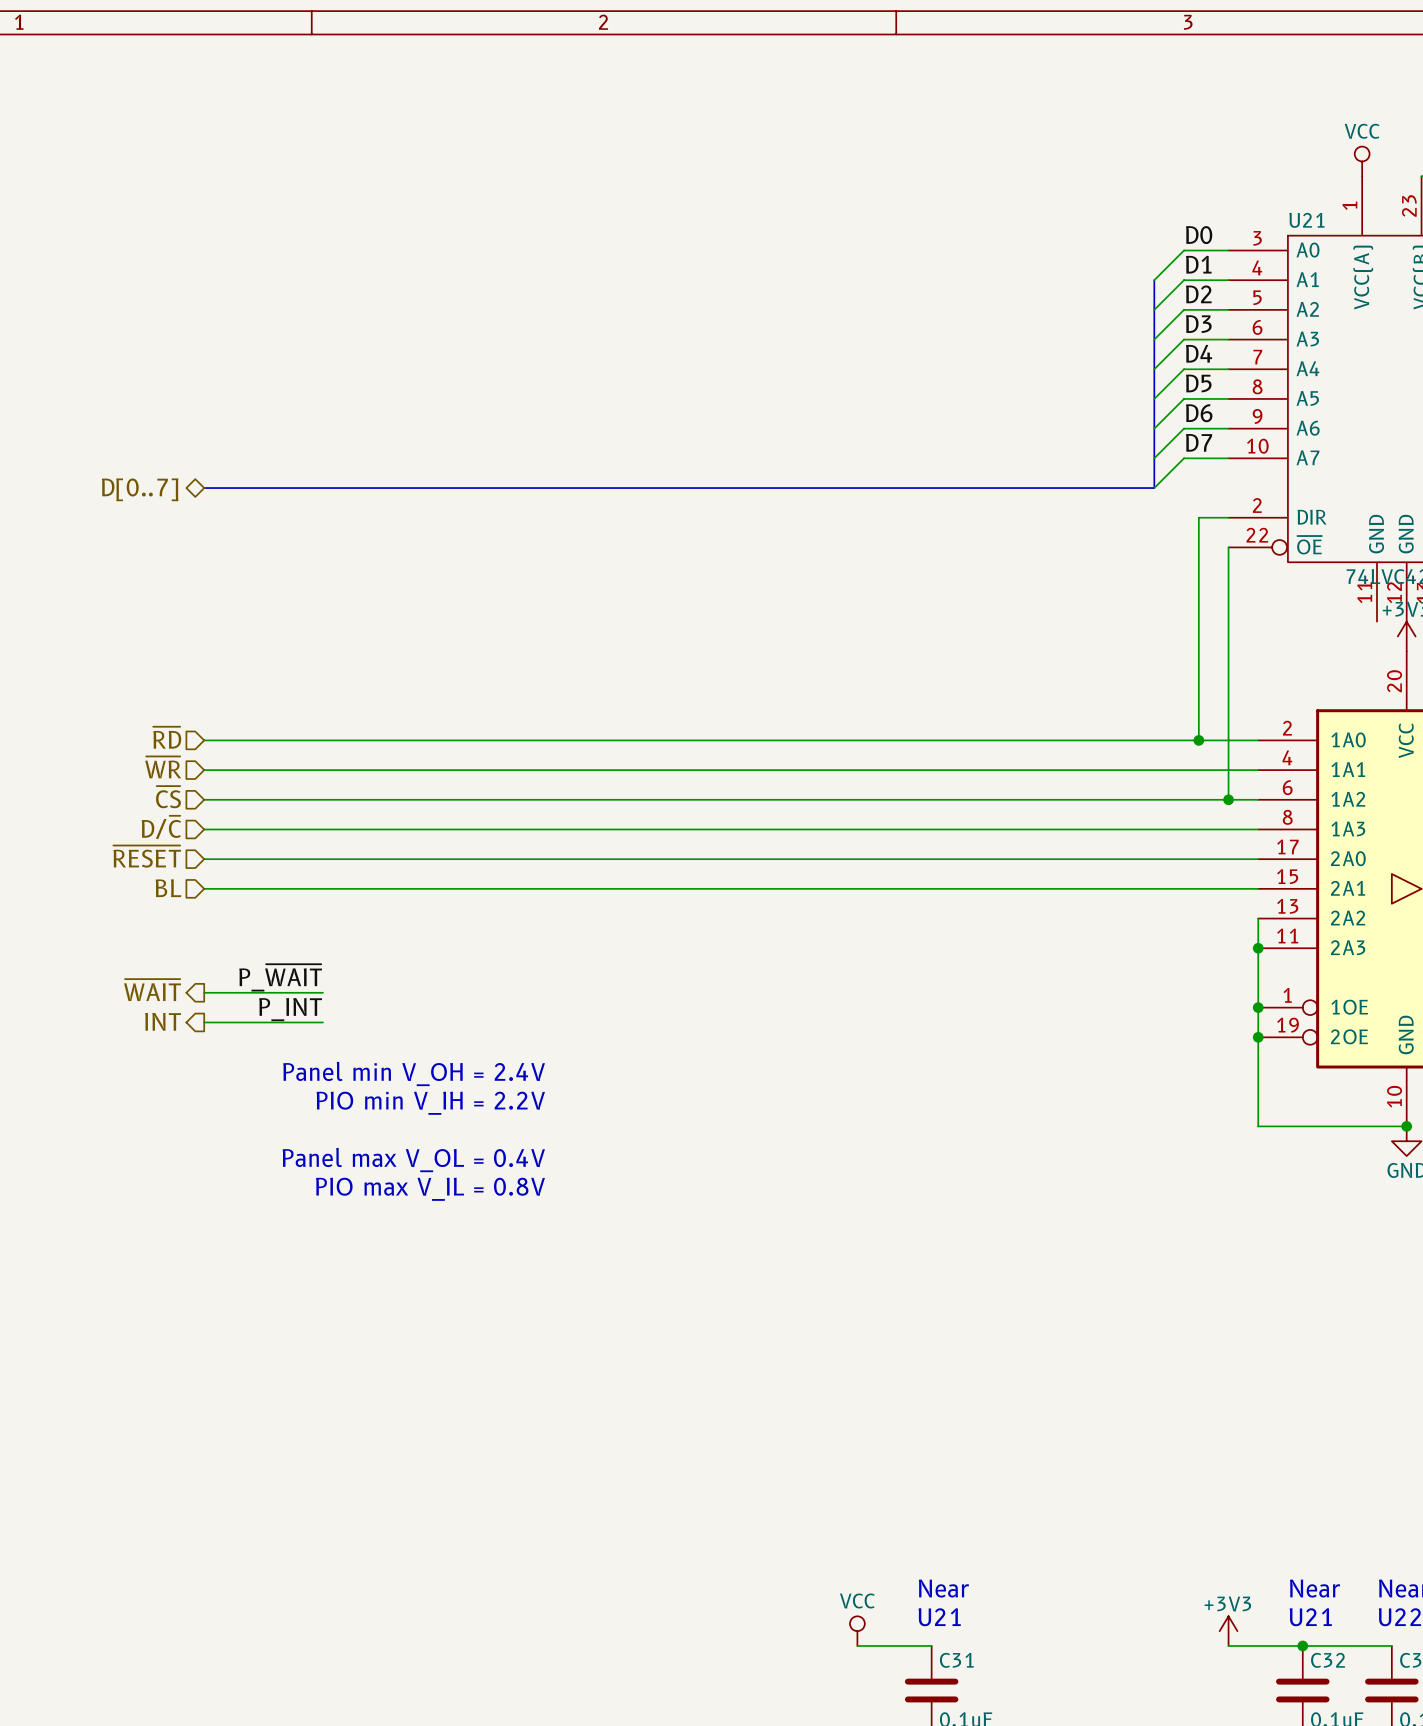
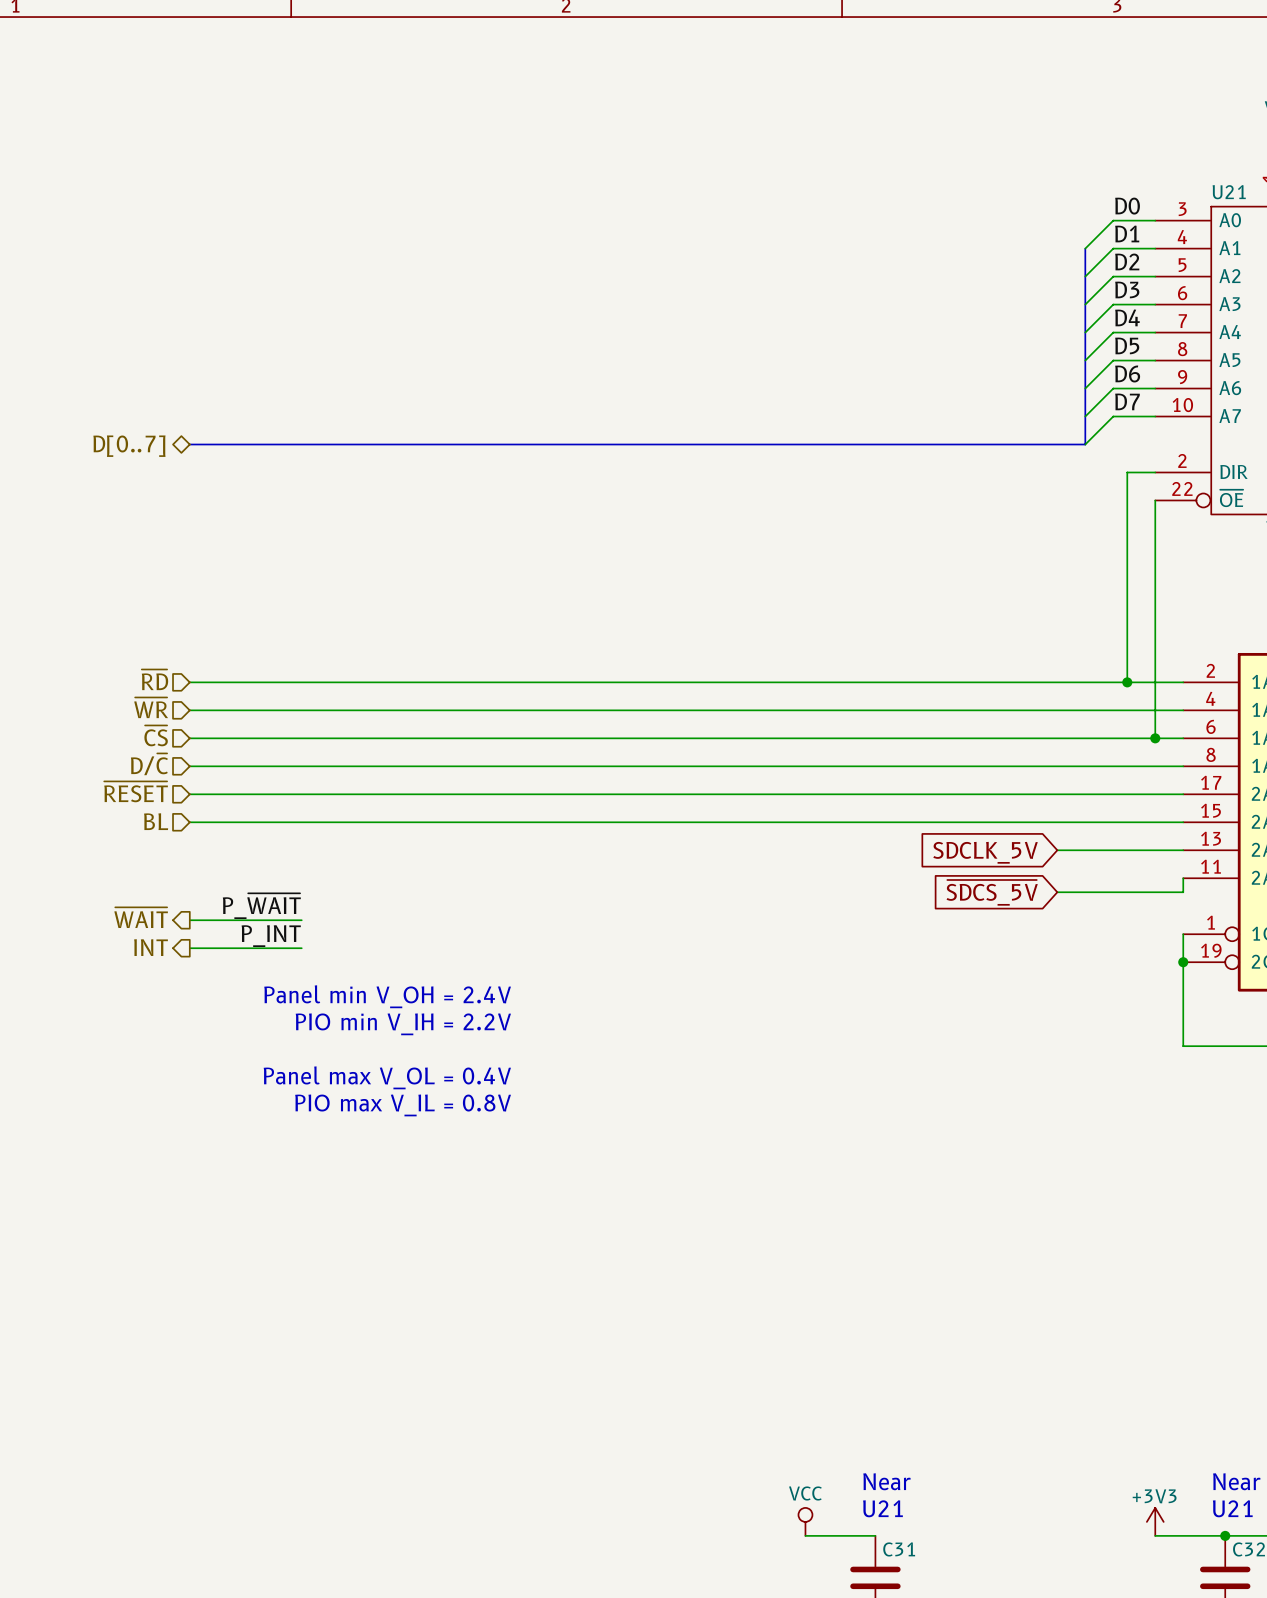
wire: (1258, 918) (1258, 948) -> (1183, 850) (1057, 850)
global label: none -> SDCLK_5V (985, 852)
junction: (1258, 948) -> none
global label: none -> ~{SDCS_5V} (992, 892)
wire: (1258, 963) (1258, 1007) -> (1183, 892) (1057, 892)
junction: (1258, 1007) -> none

